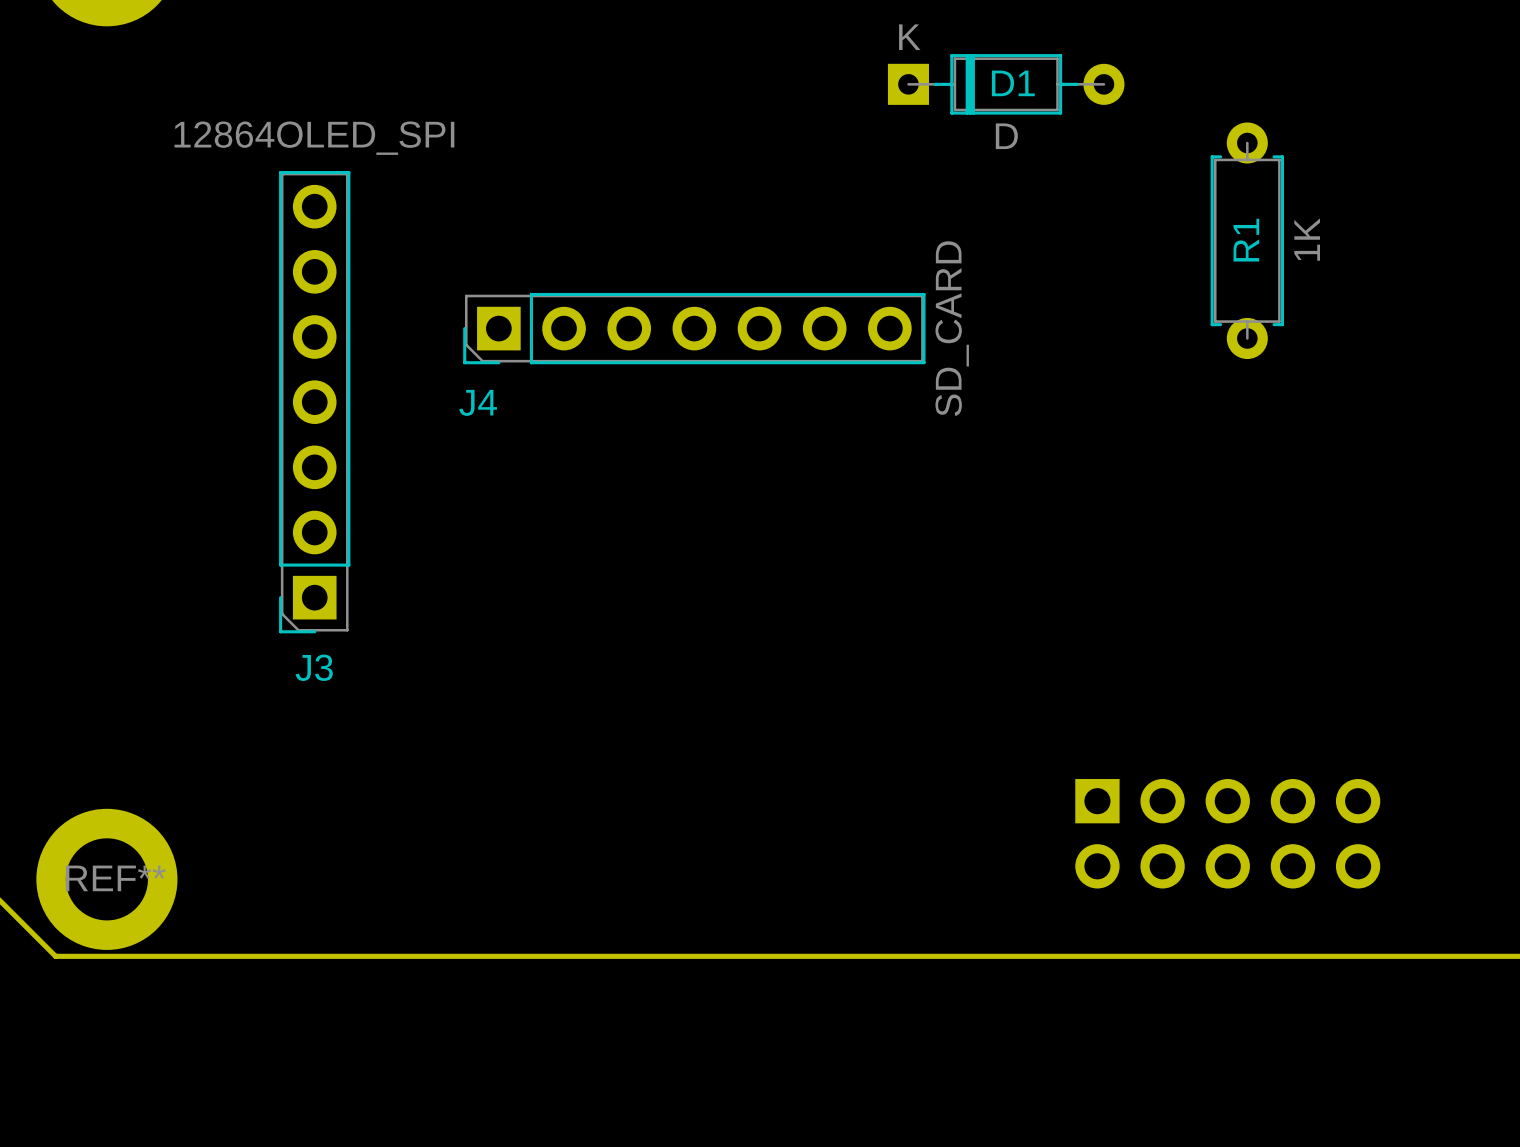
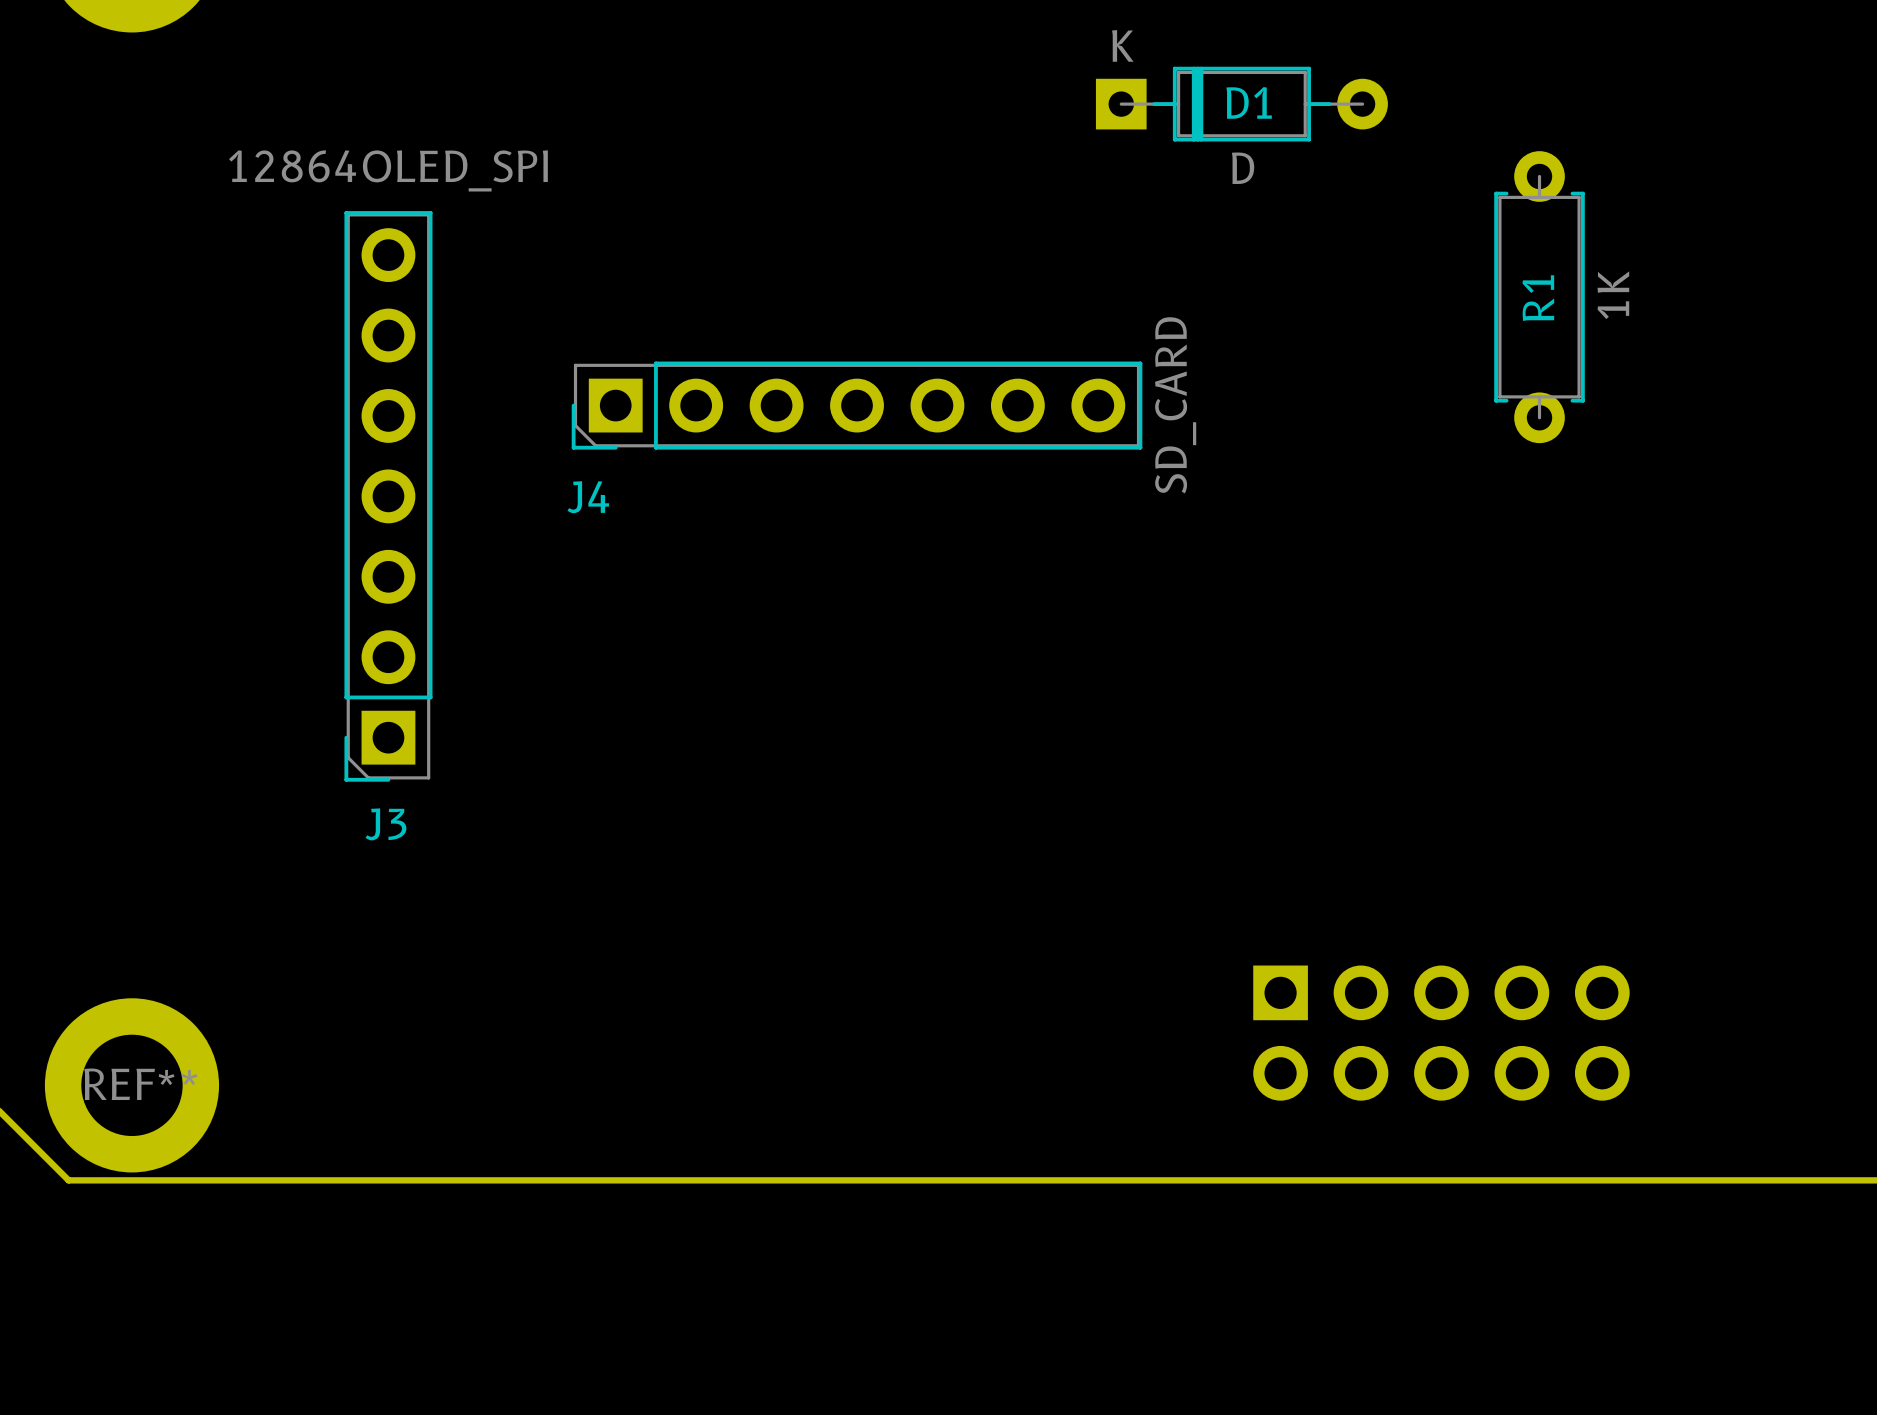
part position: (1227, 833) -> (1441, 1033)

